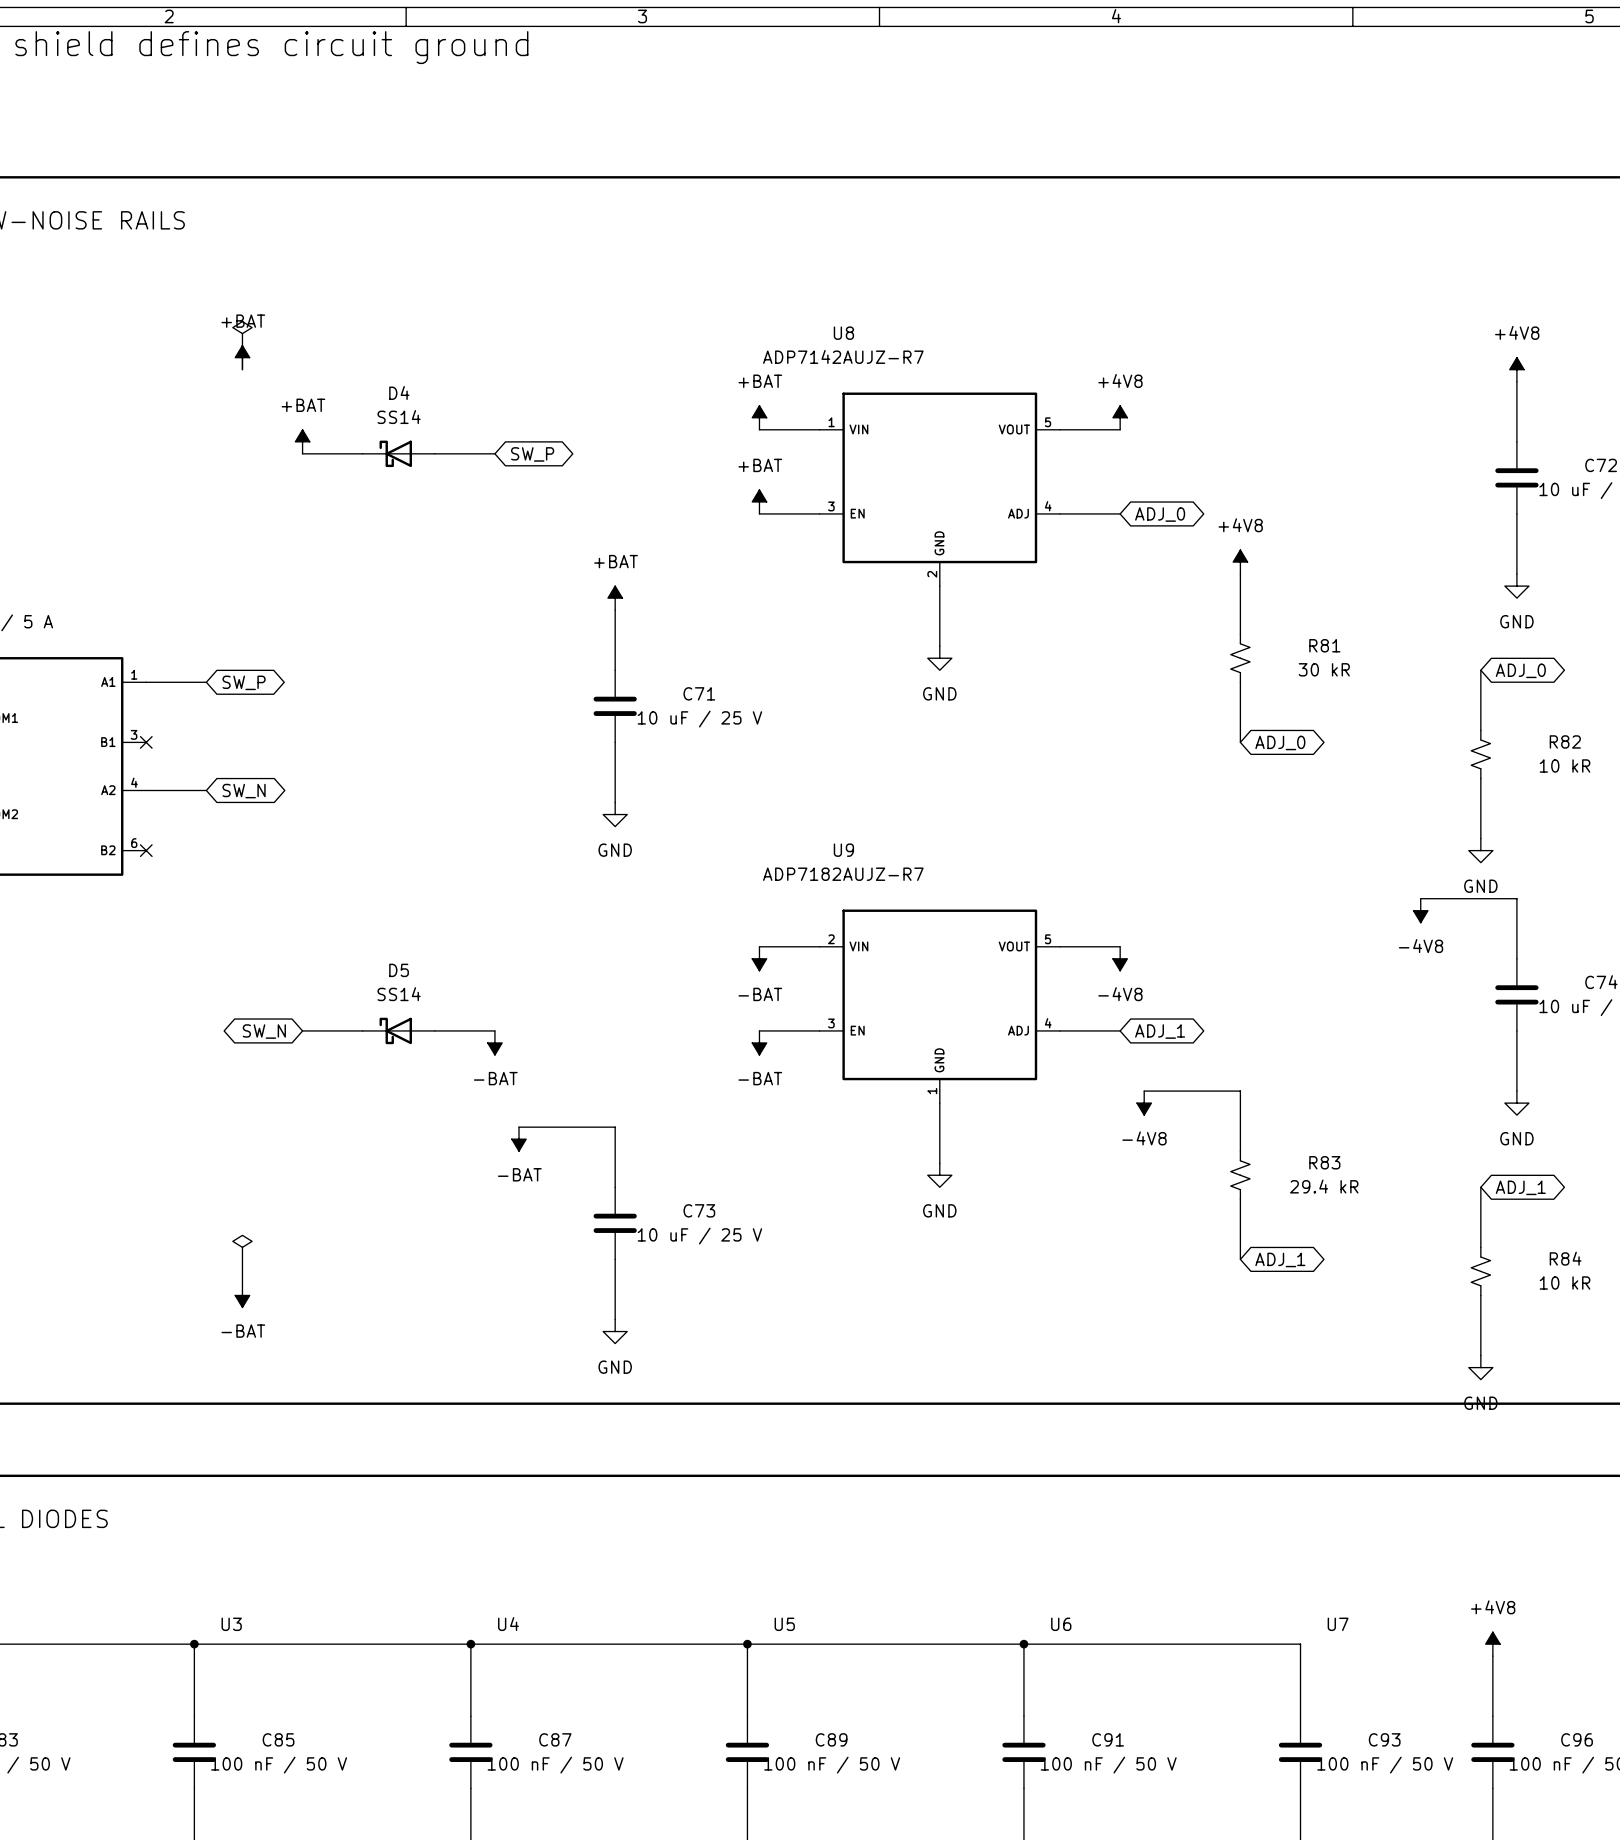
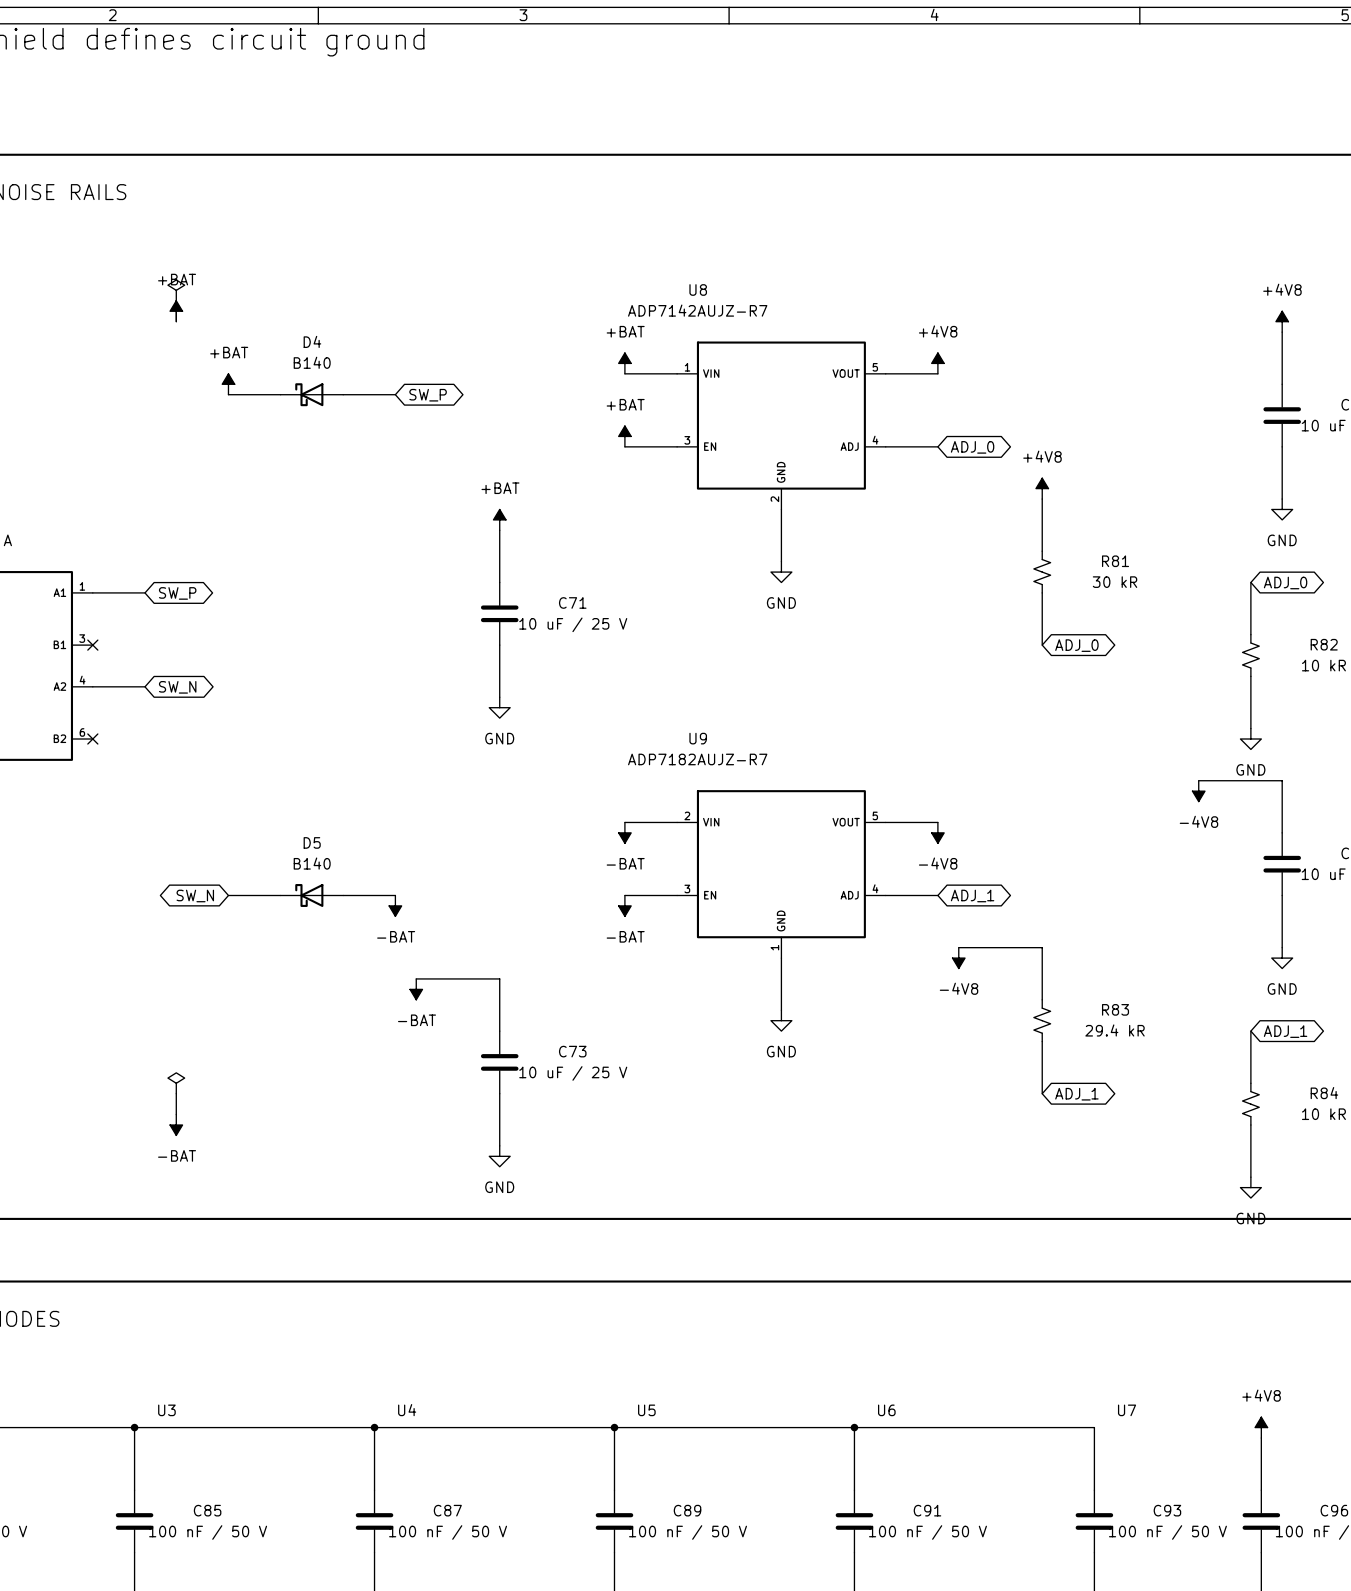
D4 value: SS14 (399, 417) -> B140 (312, 362)
D5 value: SS14 (399, 994) -> B140 (312, 863)

